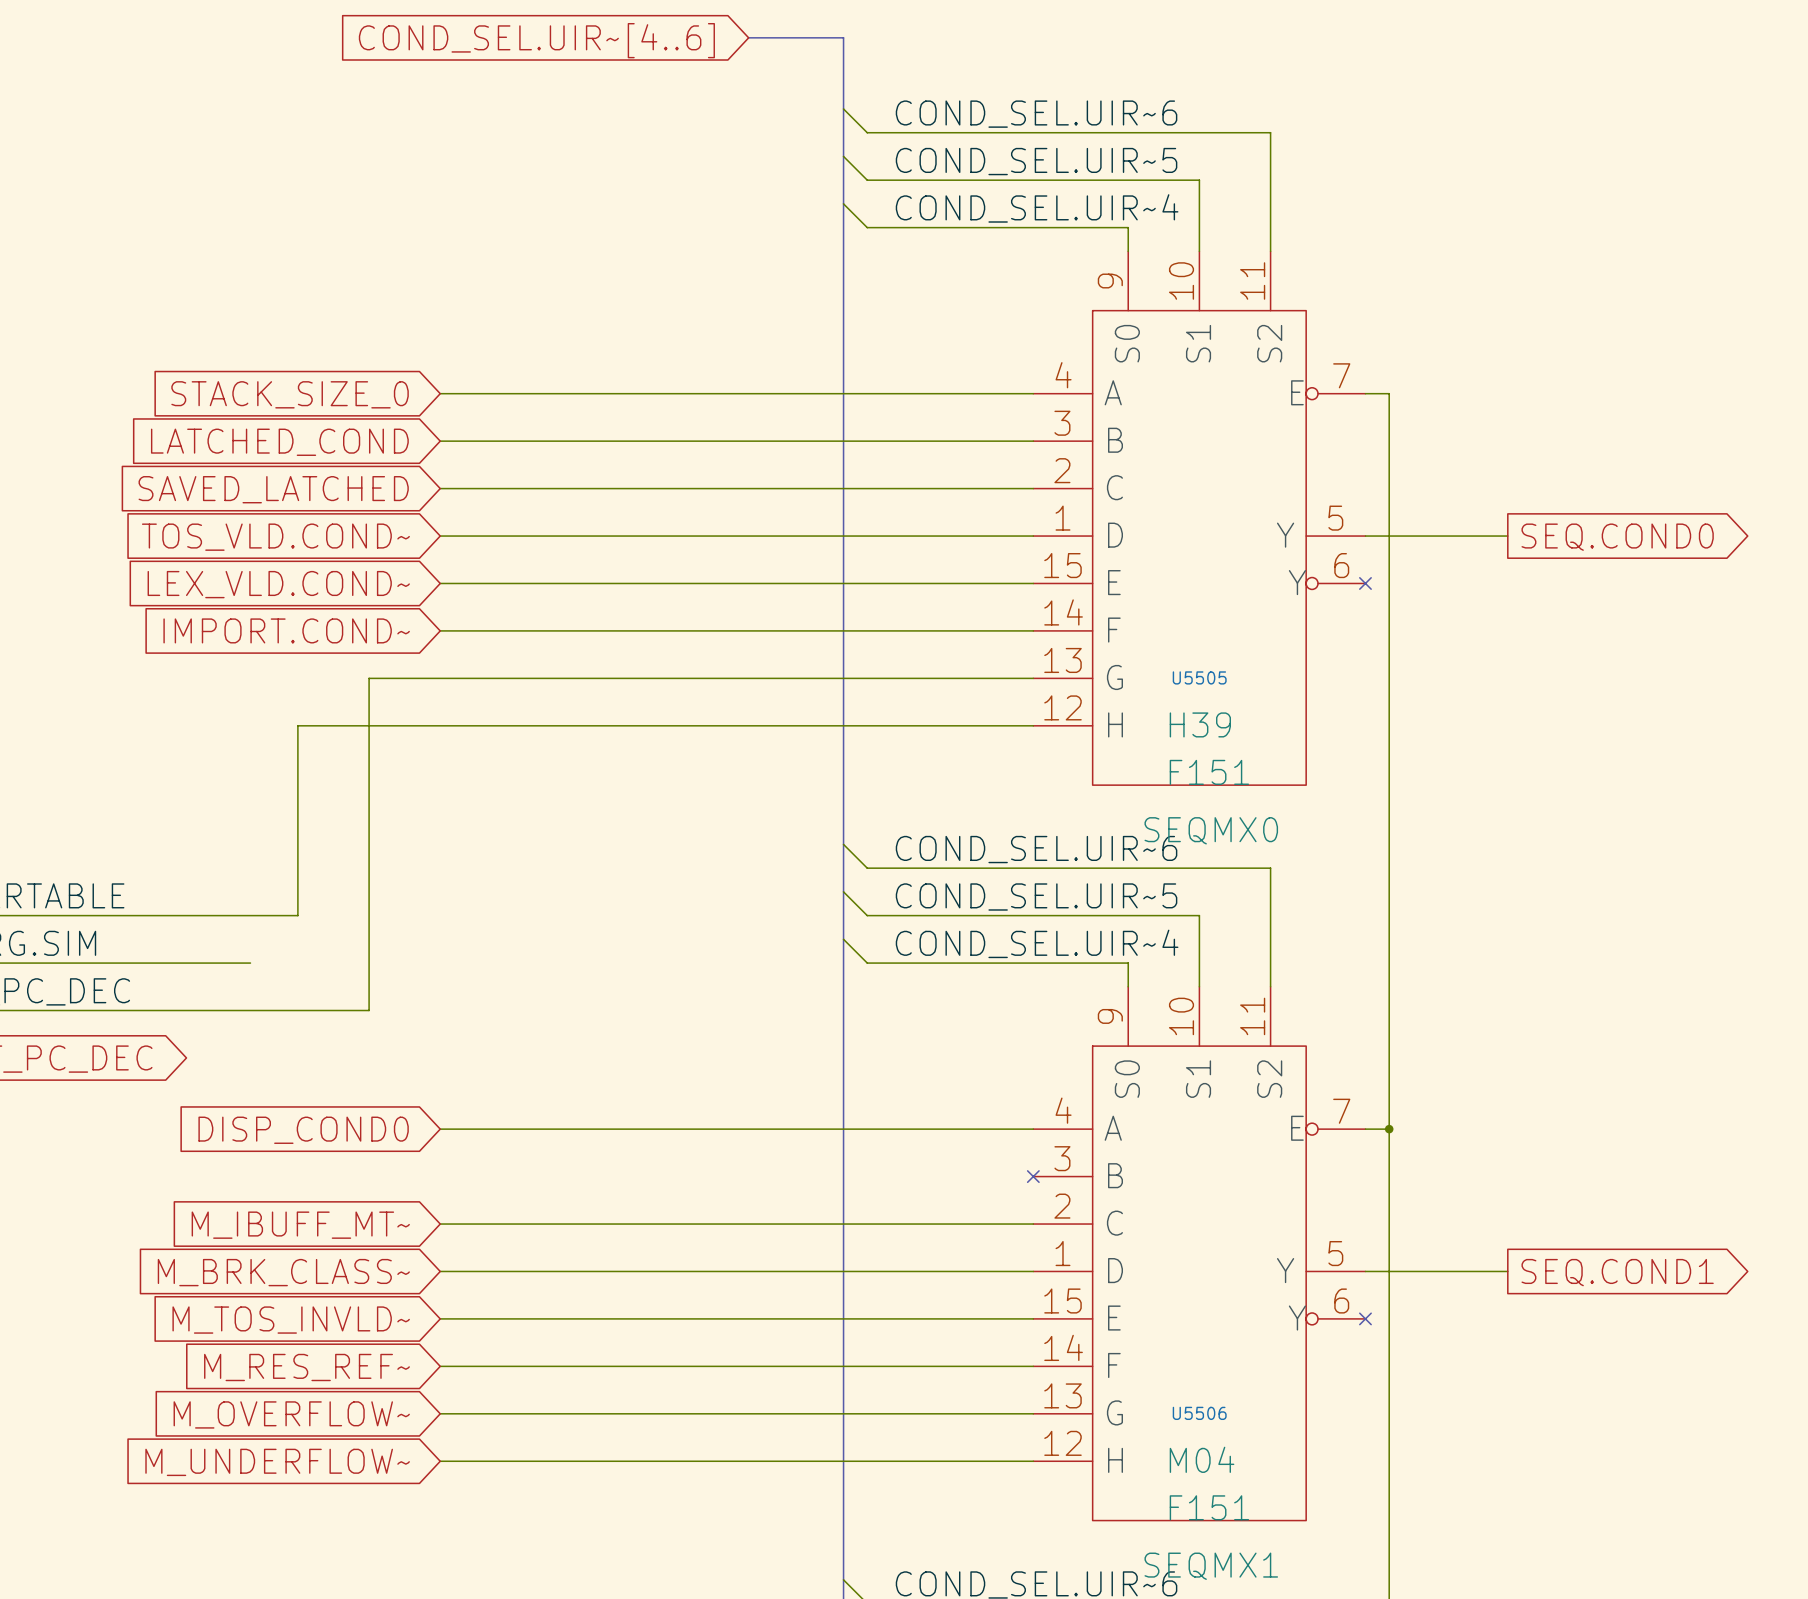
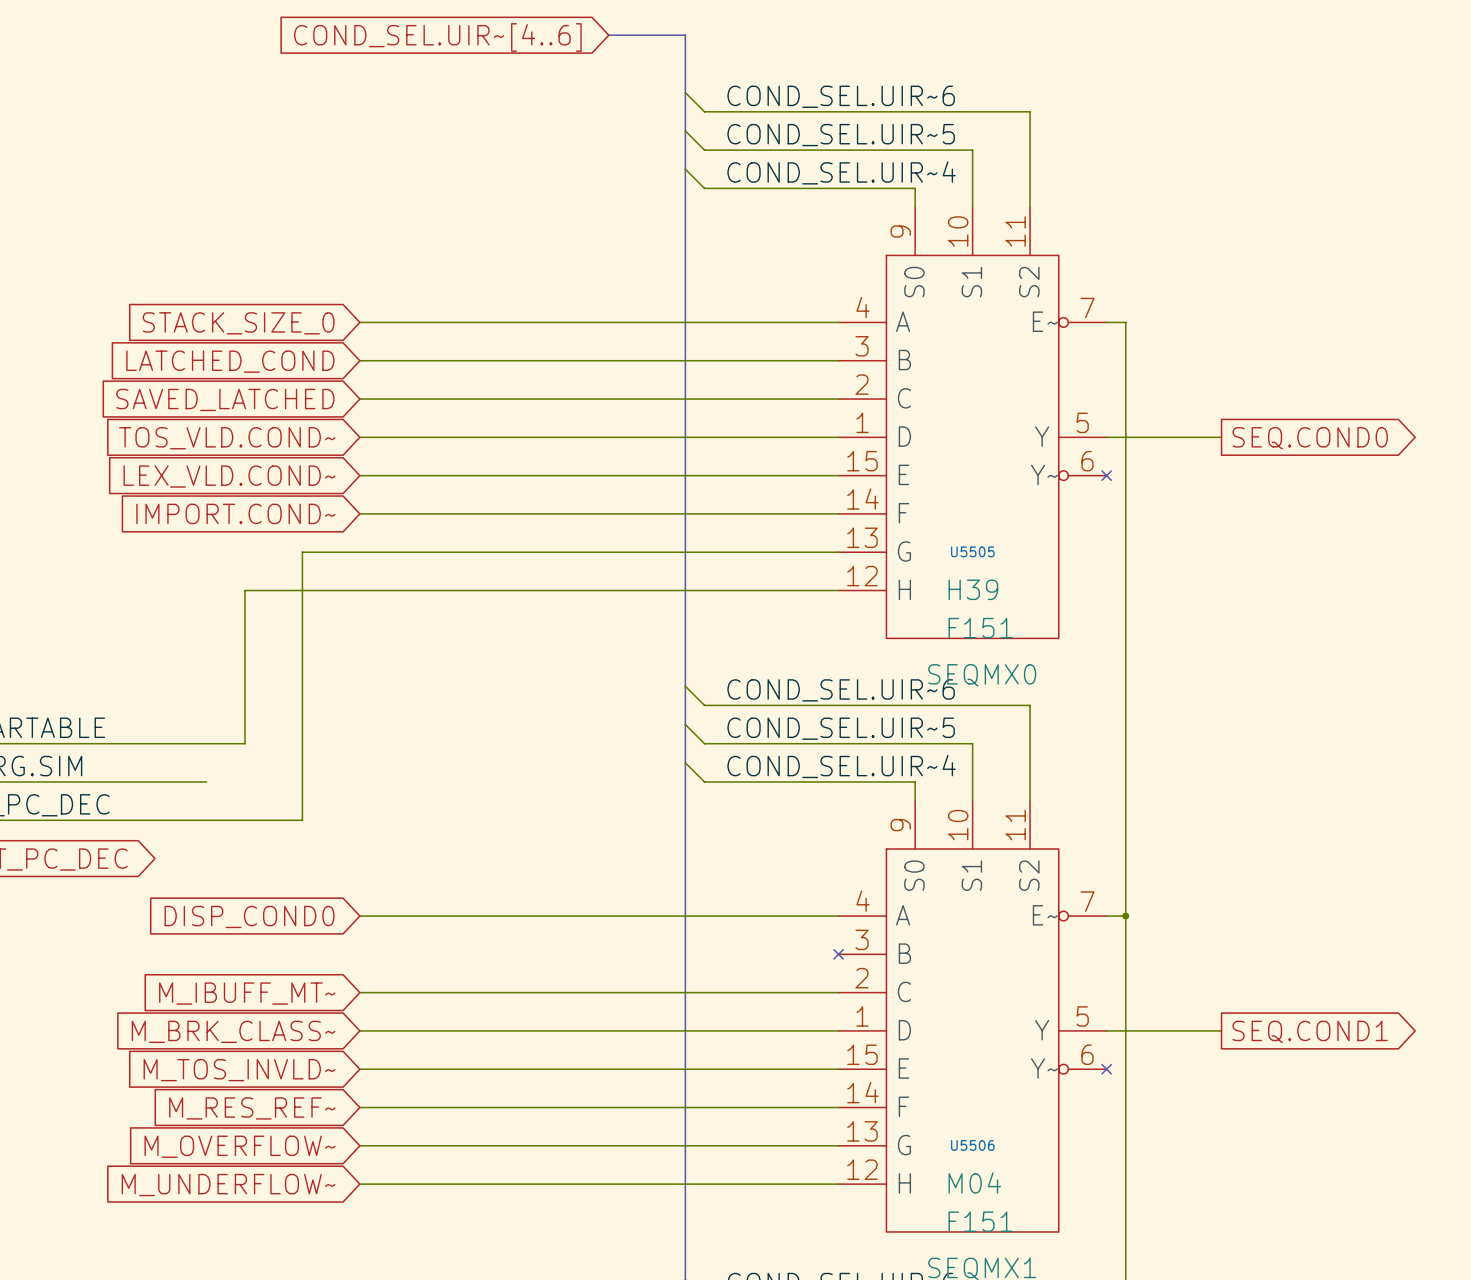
U5505 pin name: E (1297, 392) -> E~ (1045, 321)
U5505 pin name: Y (1297, 582) -> Y~ (1044, 474)
U5506 pin name: E (1297, 1128) -> E~ (1045, 915)
U5506 pin name: Y (1297, 1318) -> Y~ (1044, 1068)

